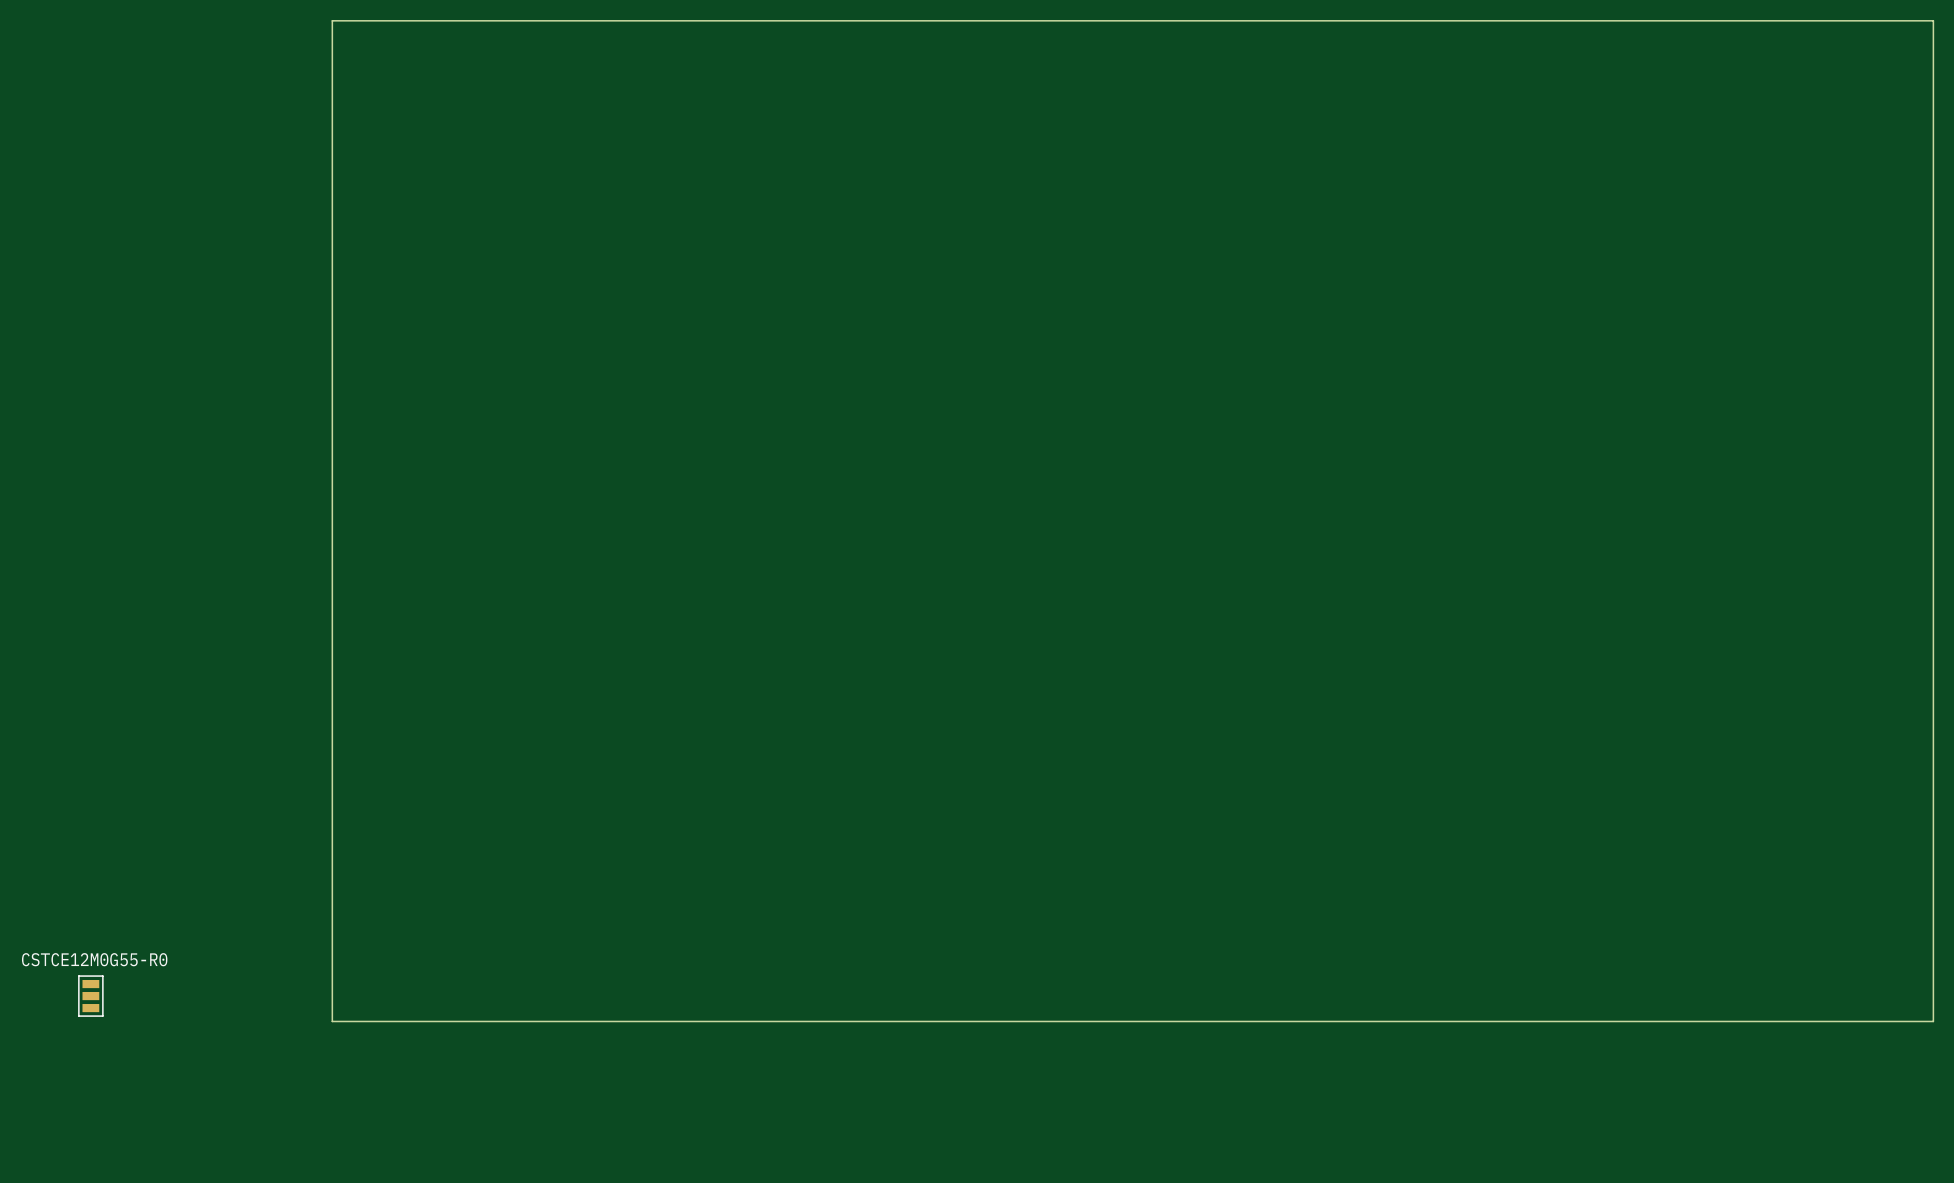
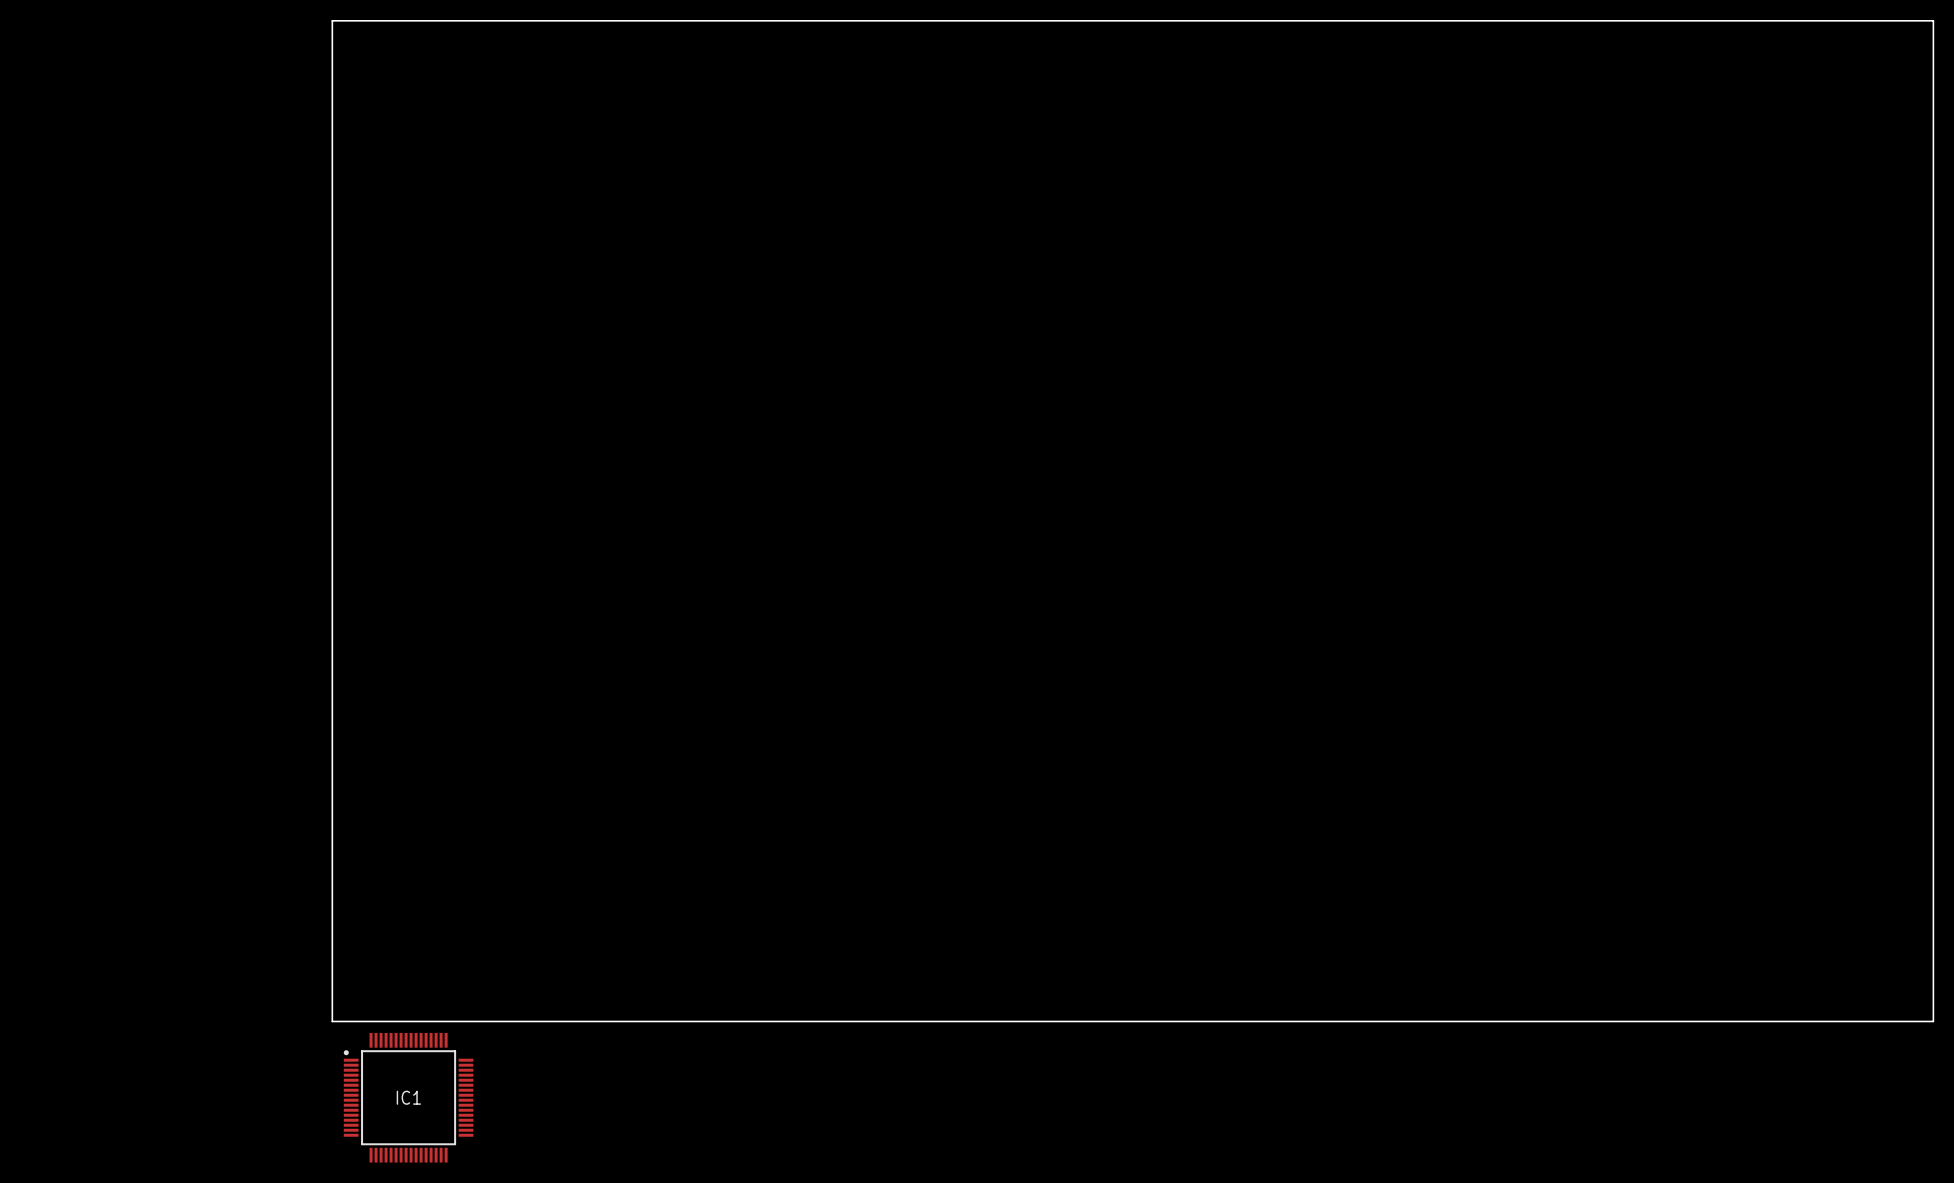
part: (90, 996) -> none
IC1: none -> (408, 1097)

